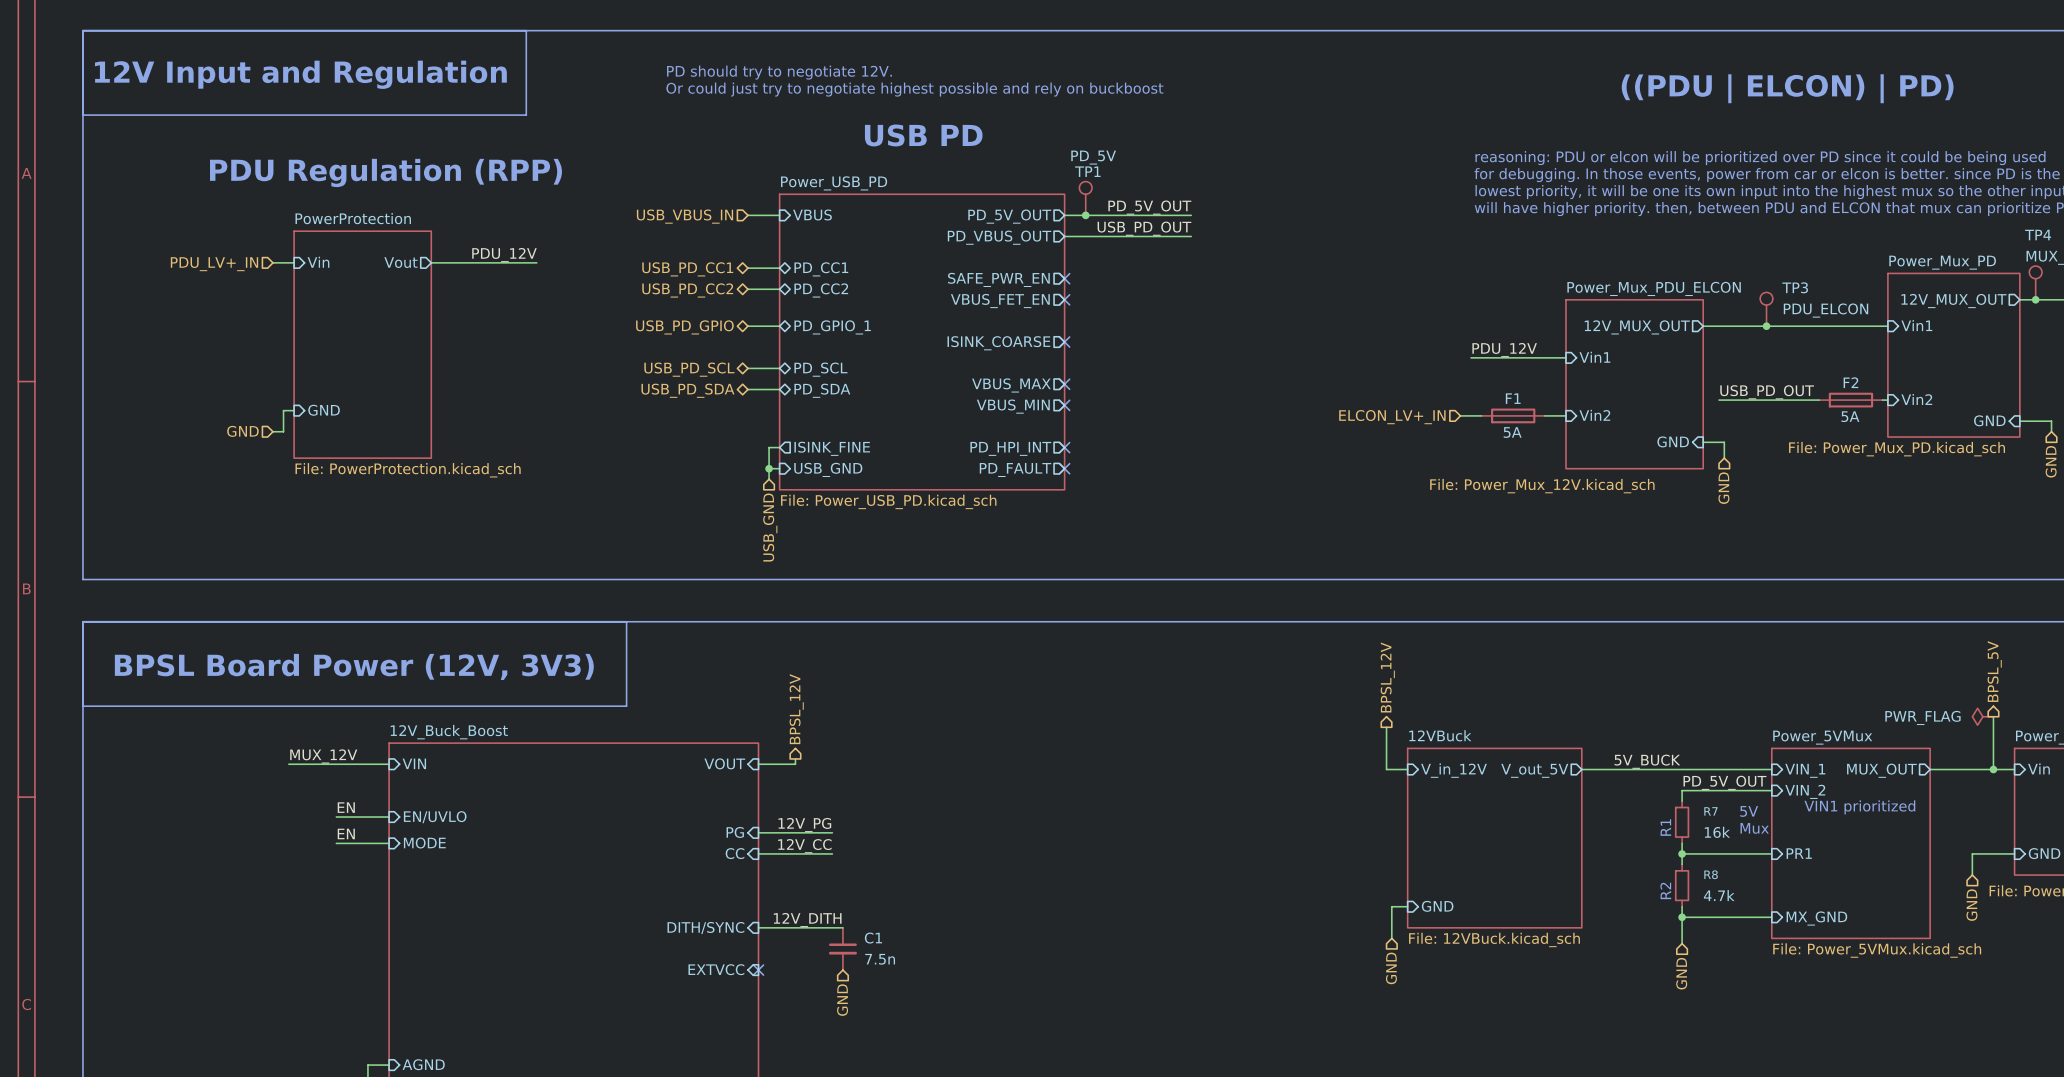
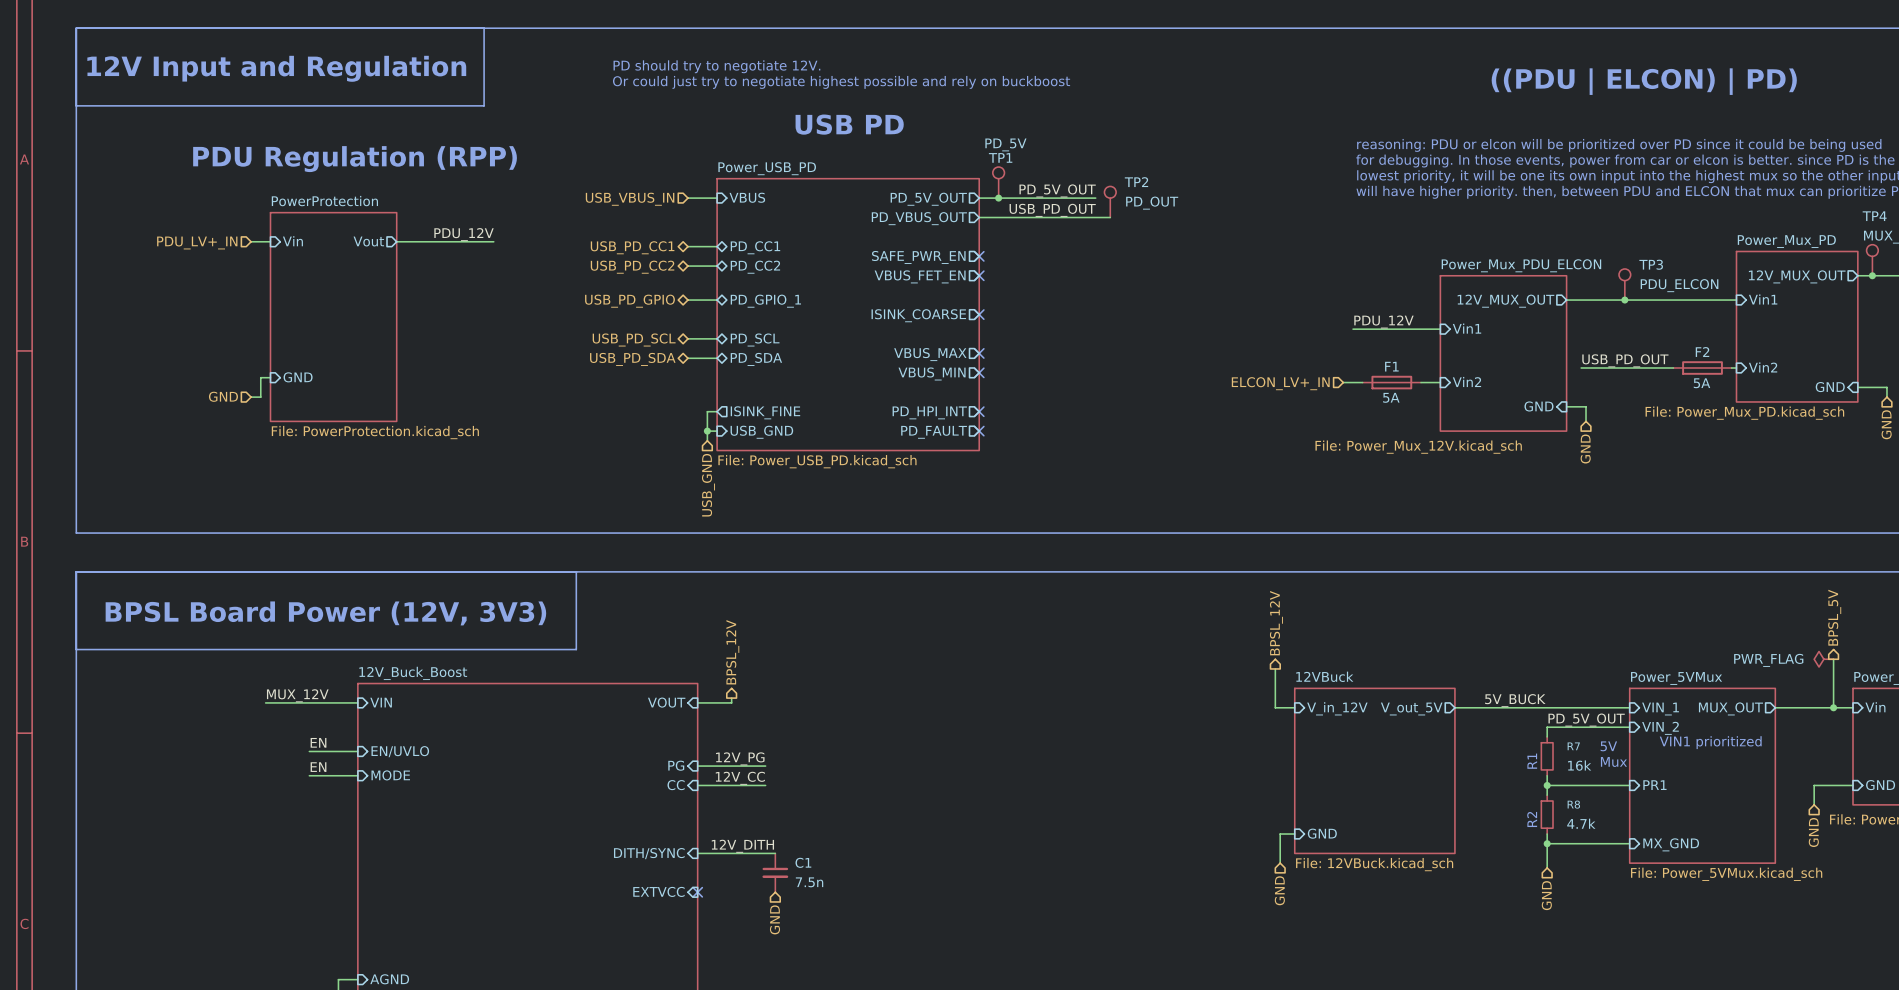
TP2: none -> PD_OUT (1110, 201)
wire: none -> (1095, 217) (1110, 217)

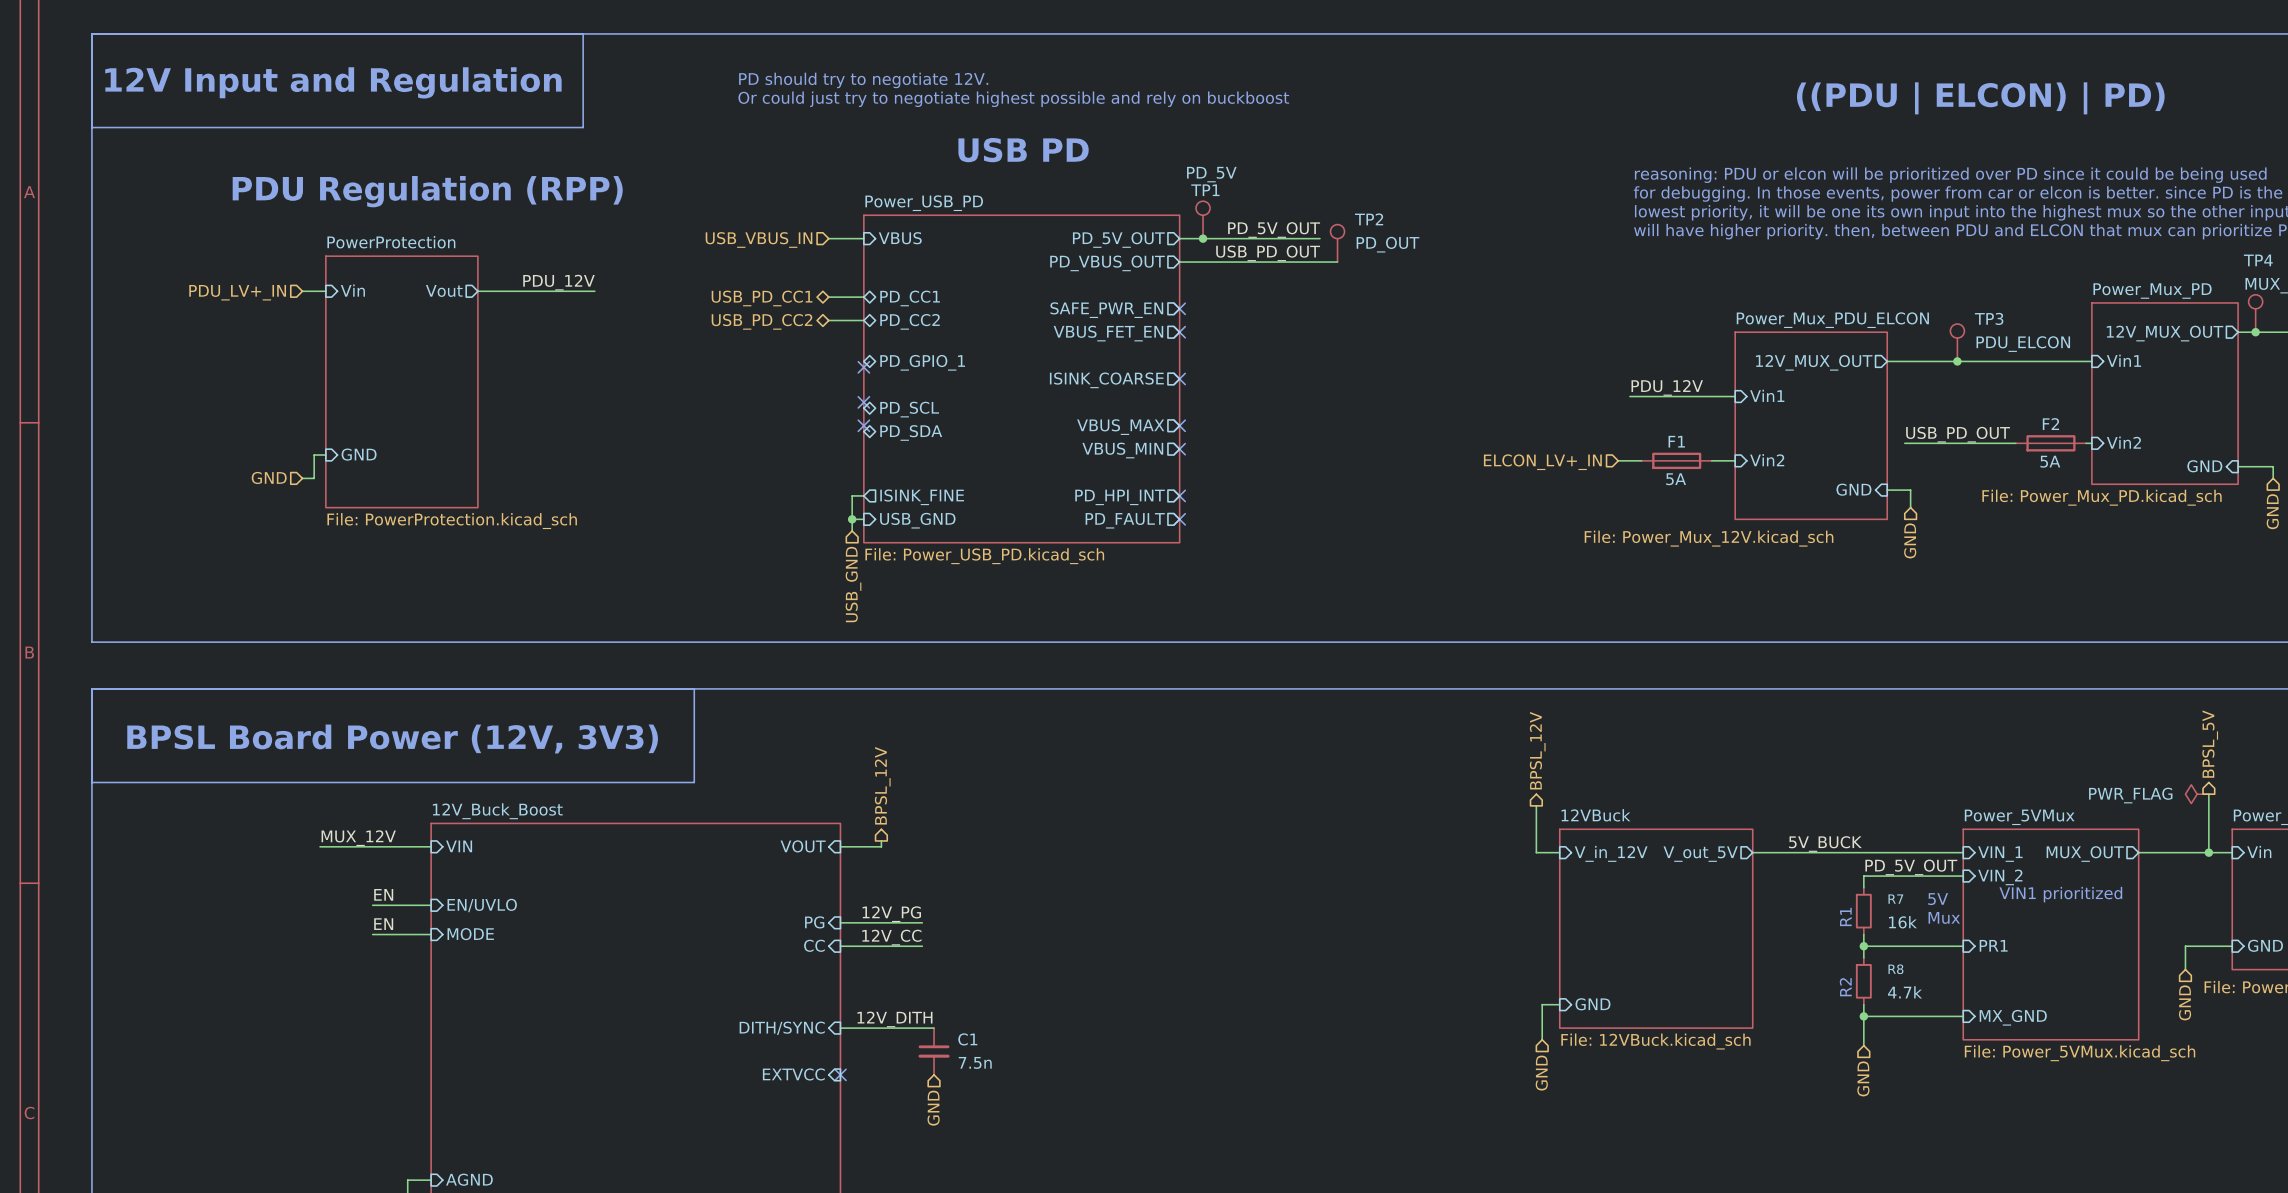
wire: (687, 300) (717, 300) -> none
hierarchical label: USB_PD_GPIO (629, 301) -> none
no-connect mark: none -> (863, 367)
no-connect mark: none -> (863, 402)
wire: (687, 338) (717, 338) -> none
hierarchical label: USB_PD_SCL (634, 339) -> none
no-connect mark: none -> (863, 425)
wire: (687, 358) (717, 358) -> none
hierarchical label: USB_PD_SDA (632, 359) -> none

